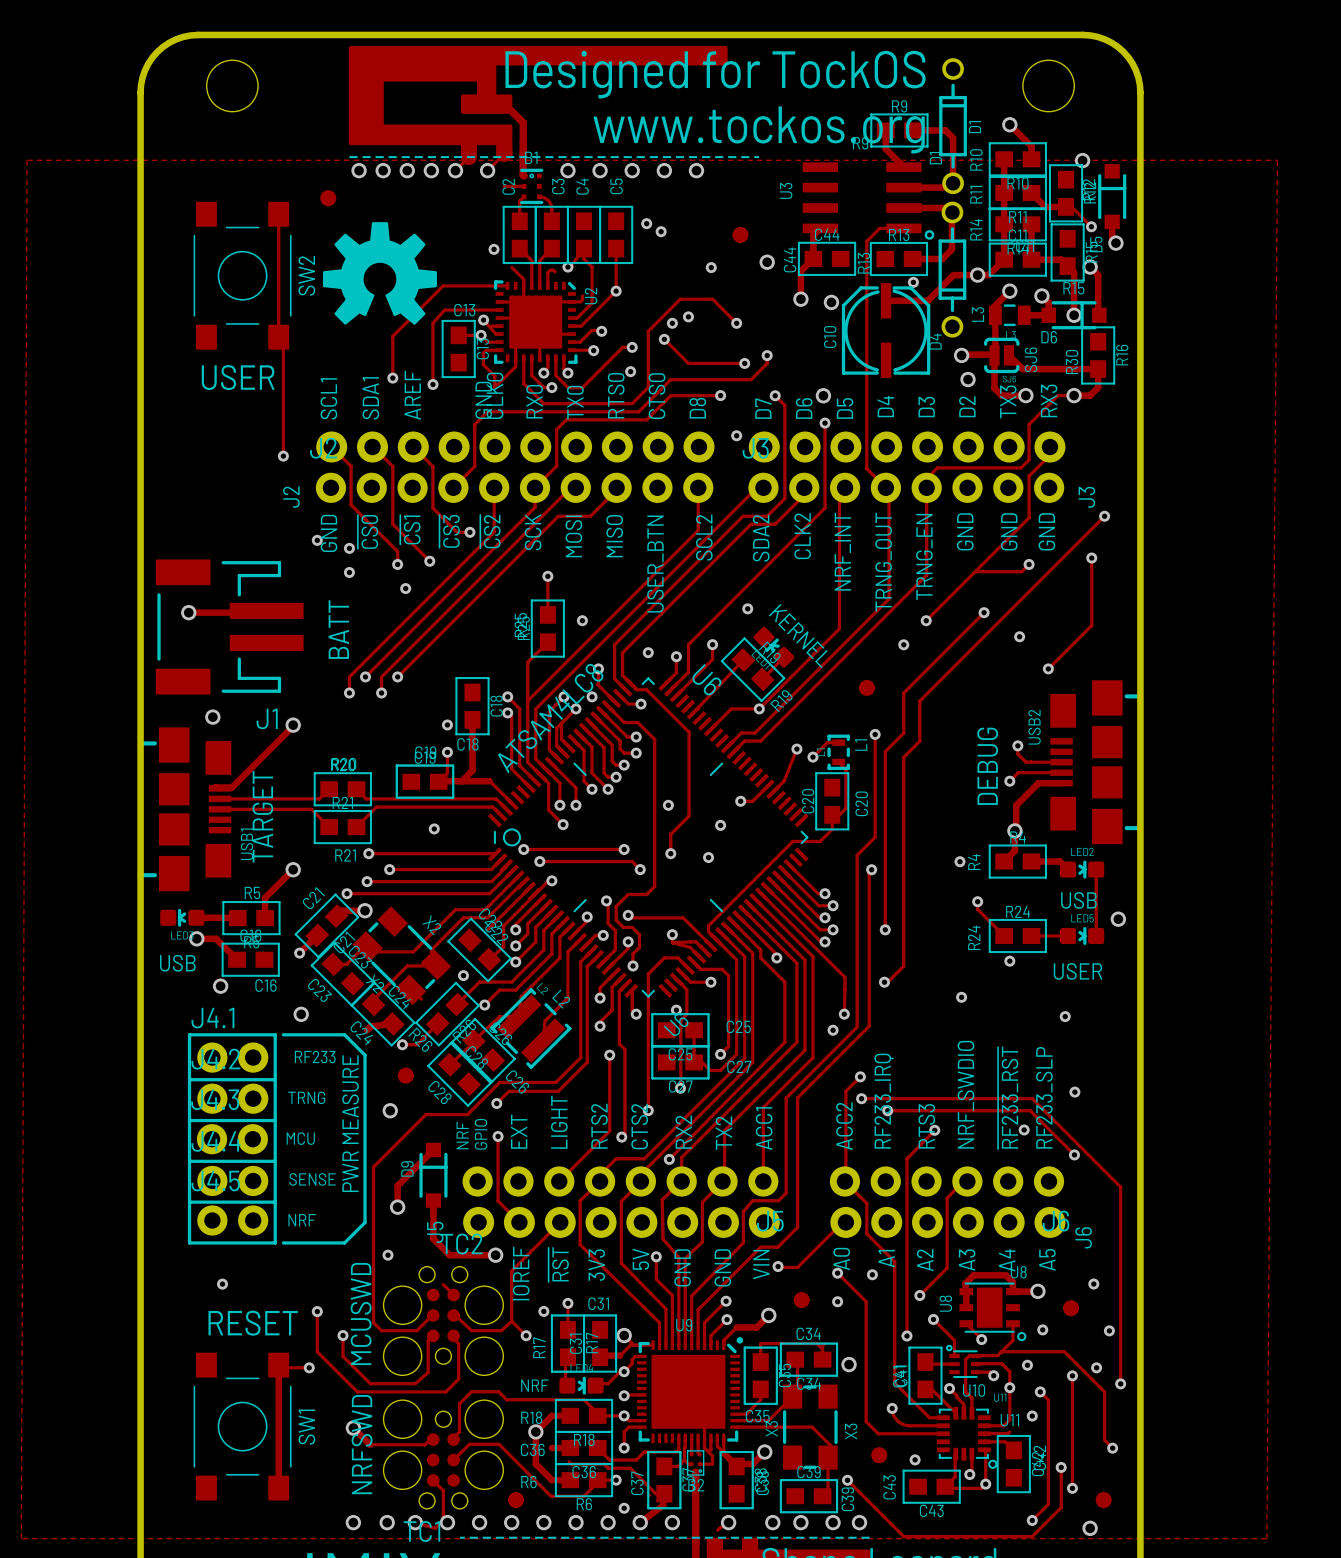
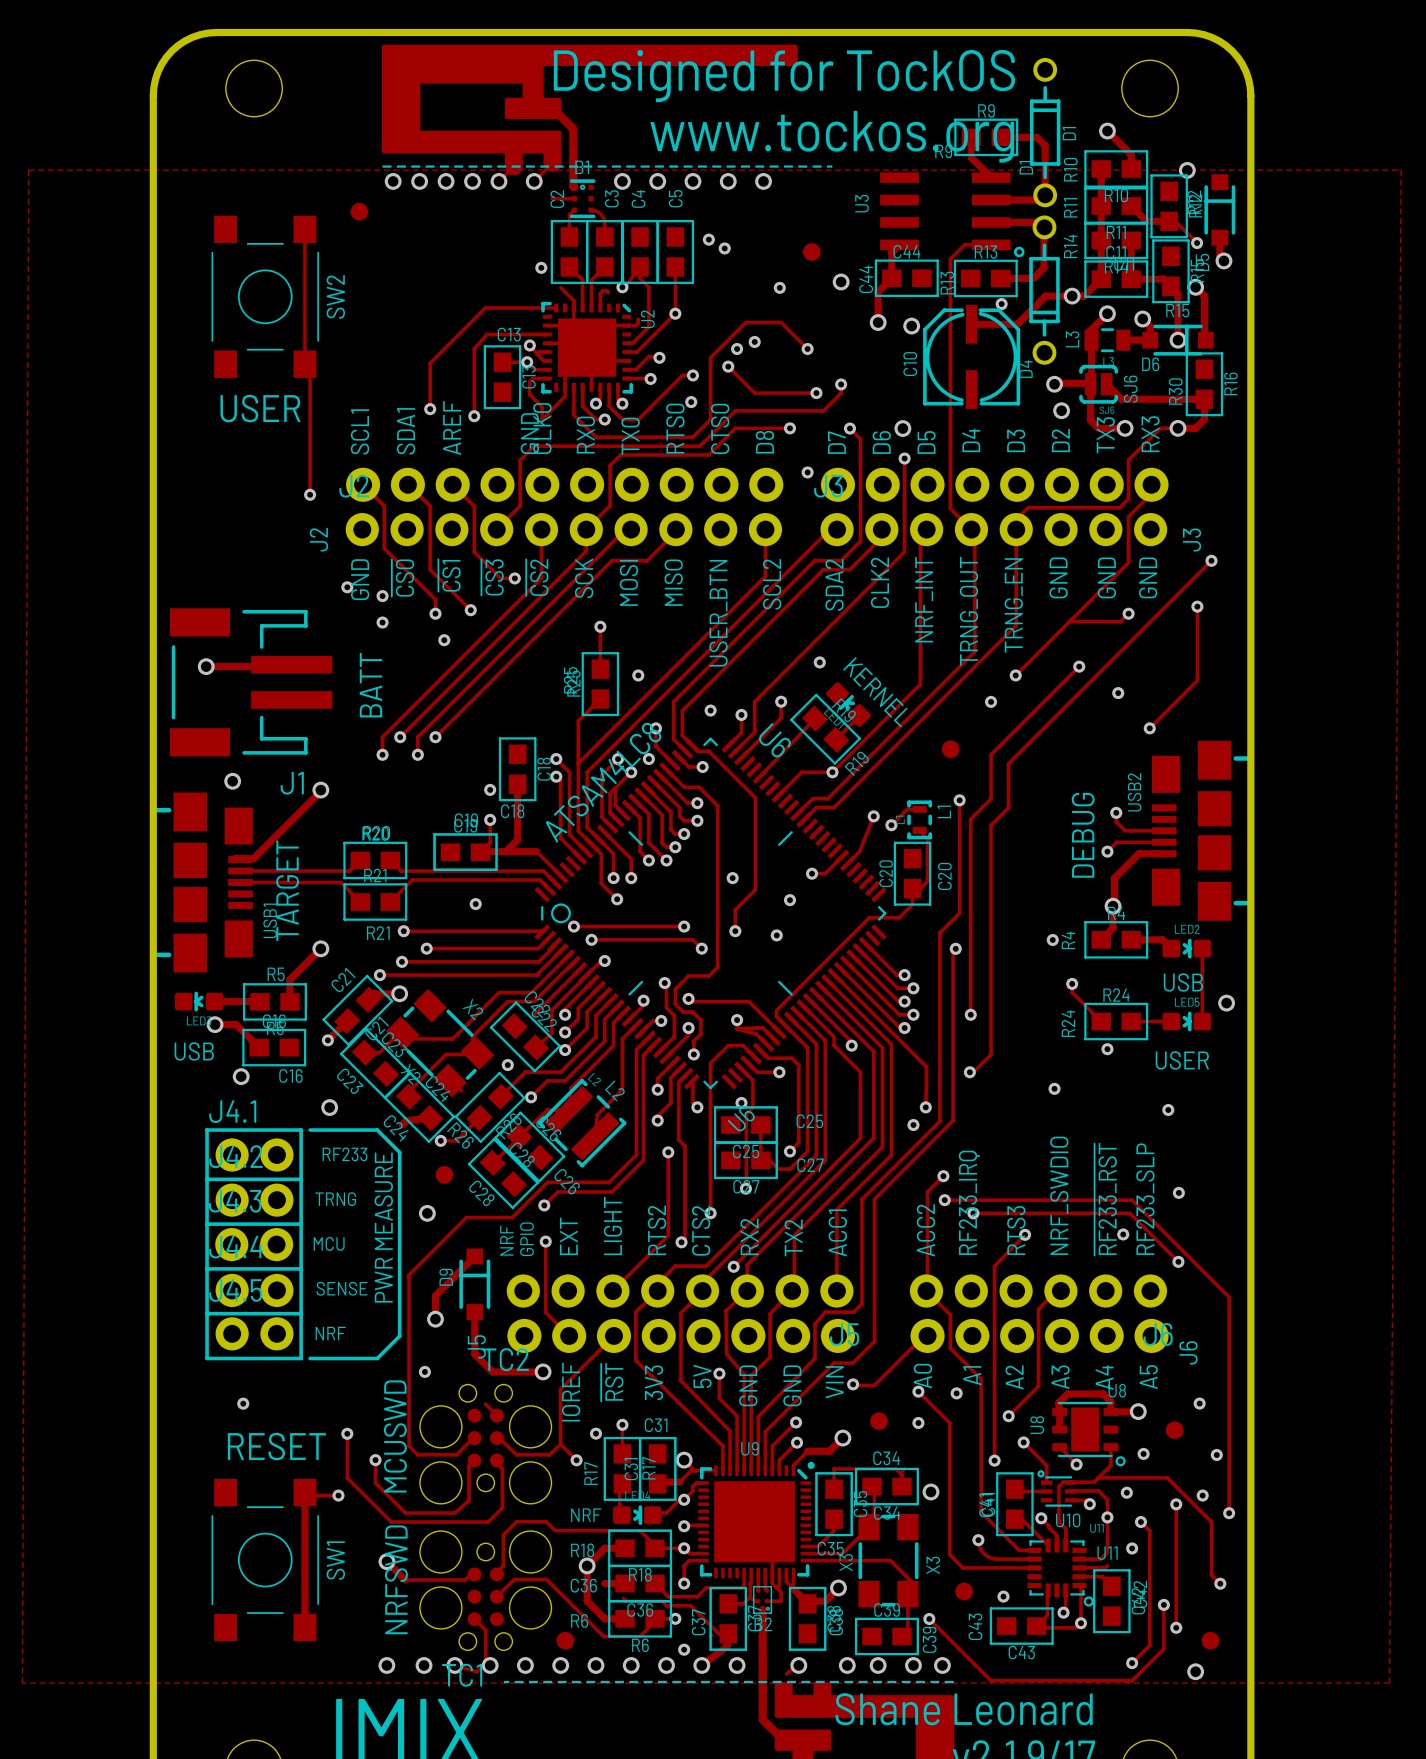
drawing: [322, 222, 437, 325] -> none

